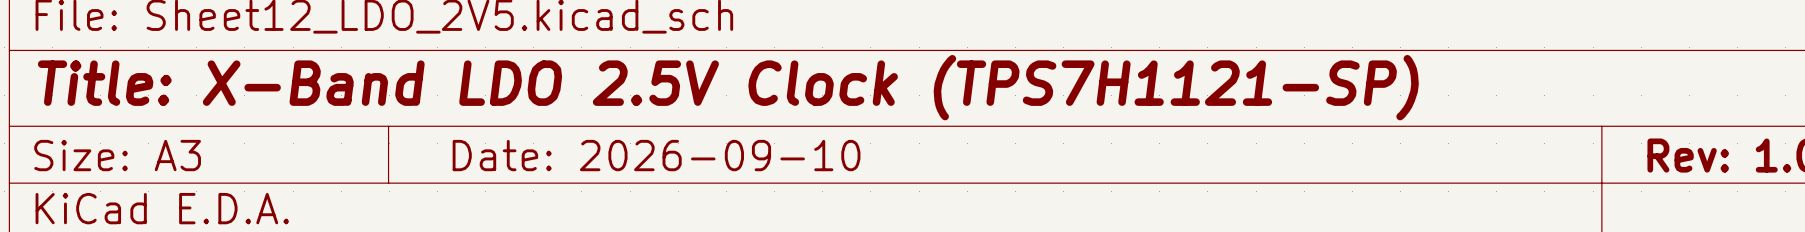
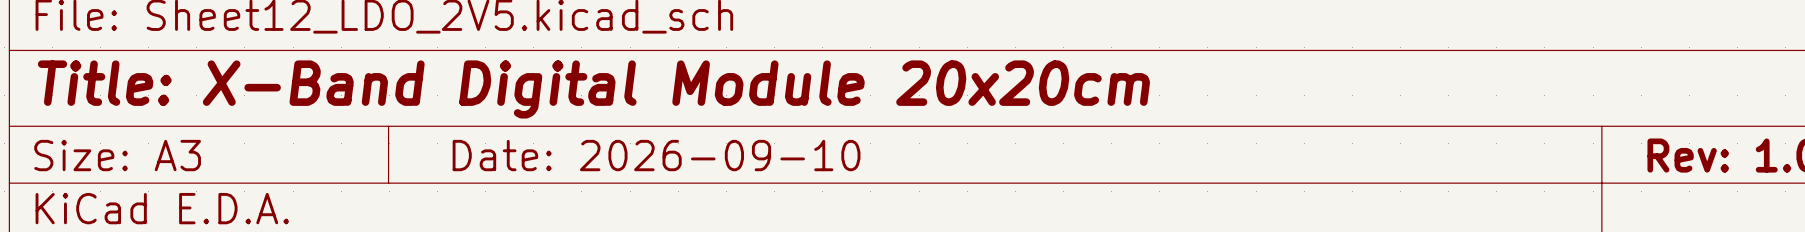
title block: Title: X-Band LDO 2.5V Clock (TPS7H1121-SP) (728, 87) -> Title: X-Band Digital Module 20x20cm (593, 89)

